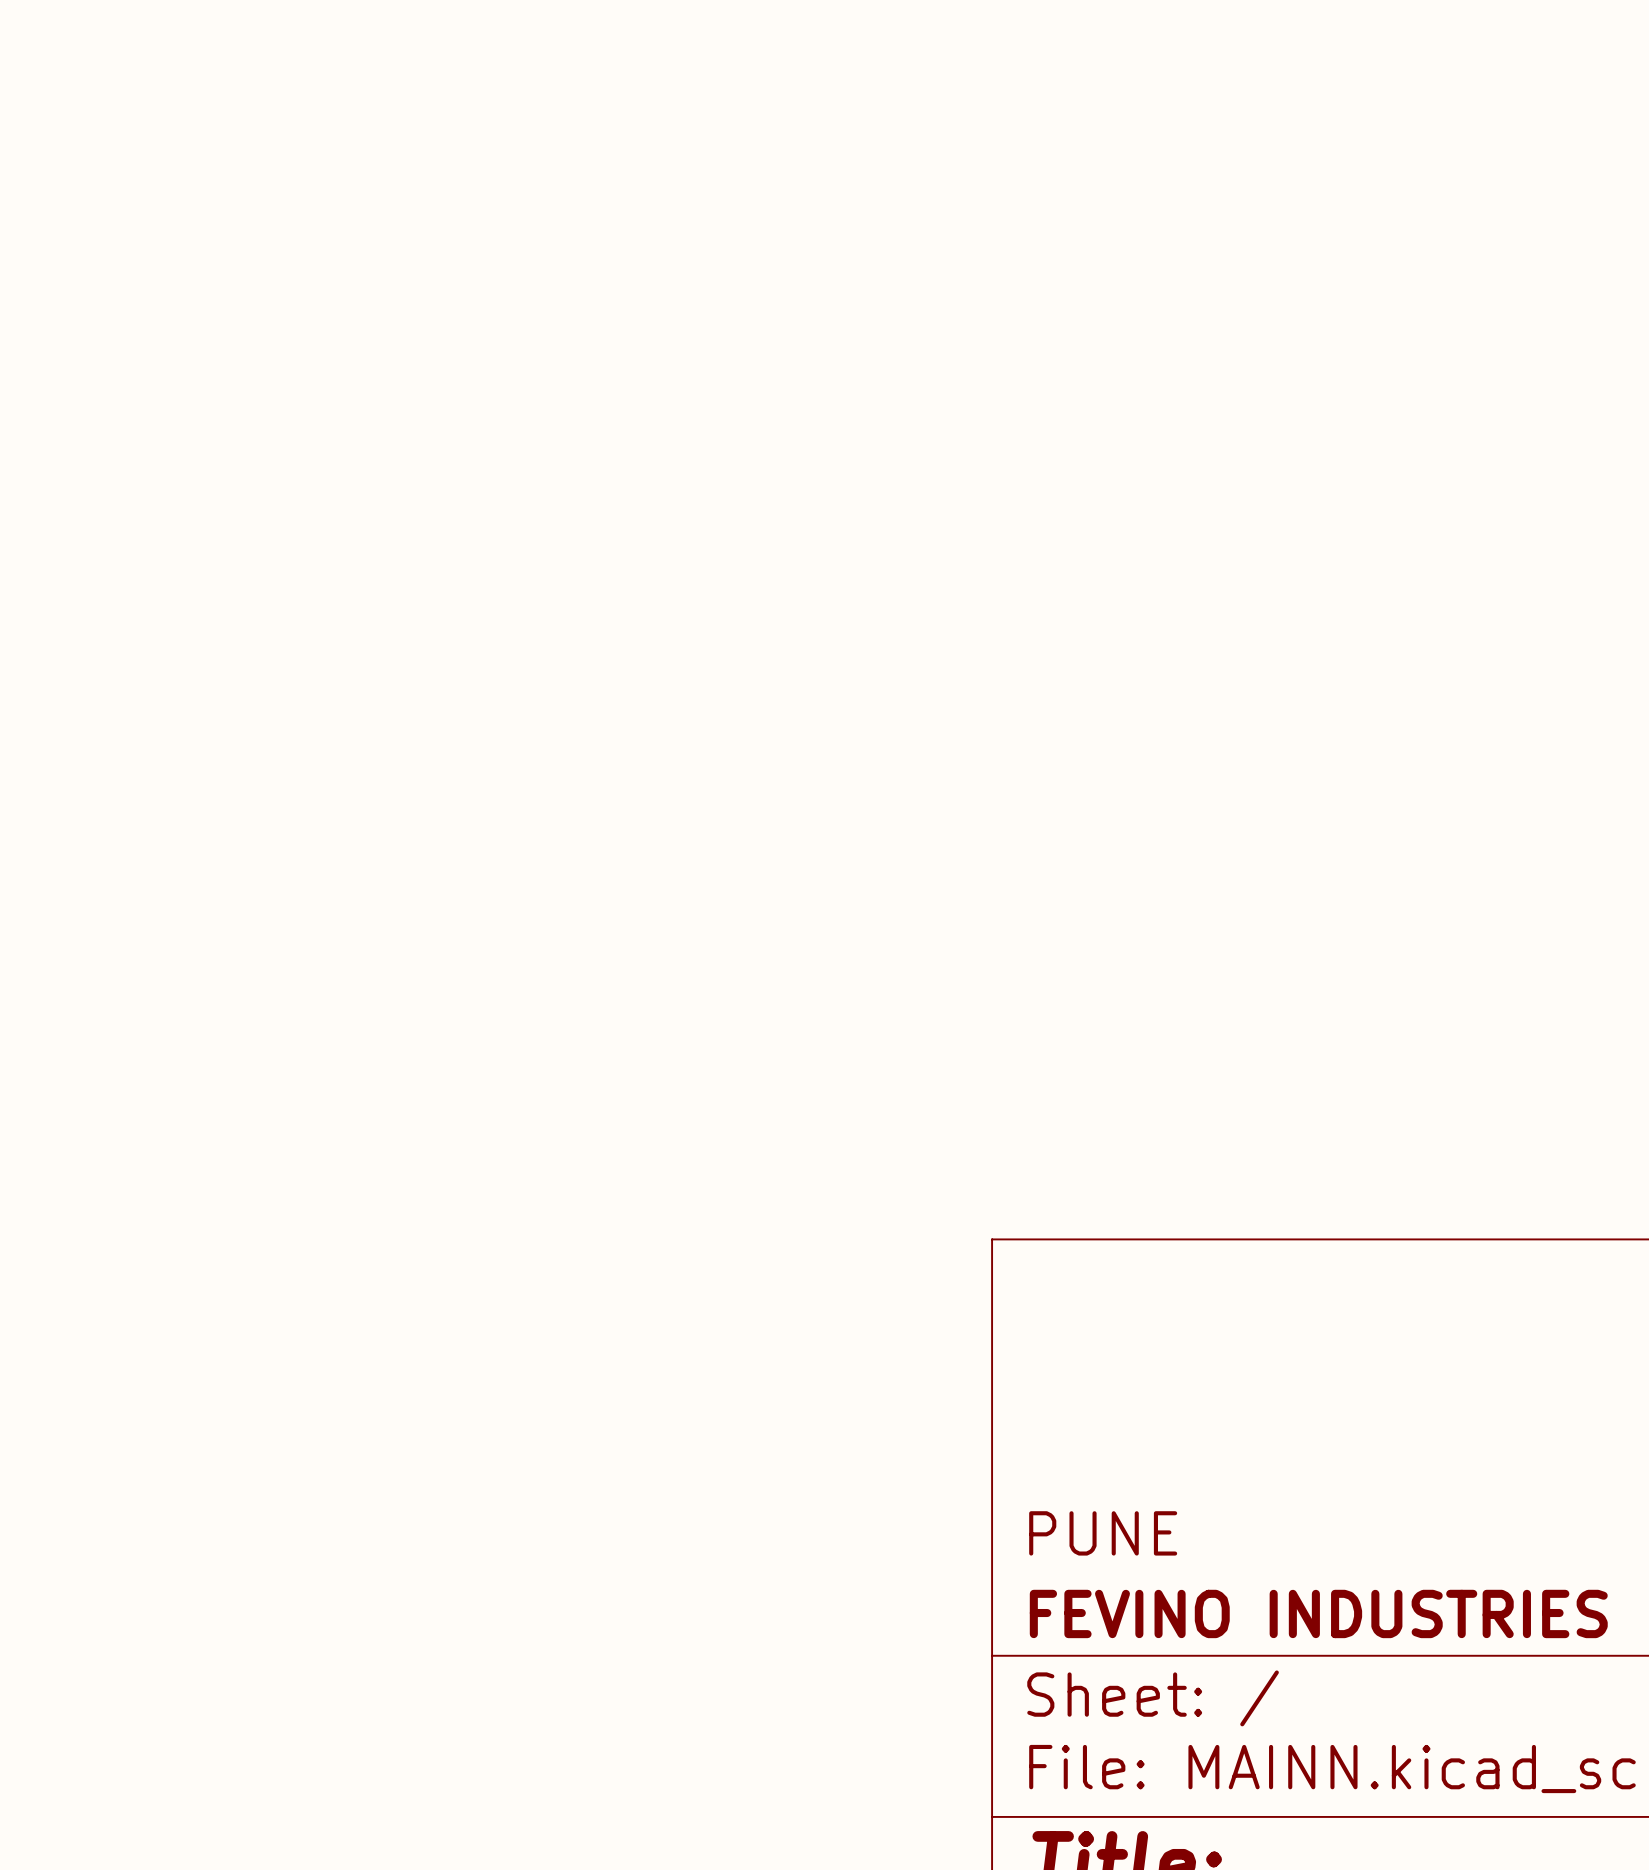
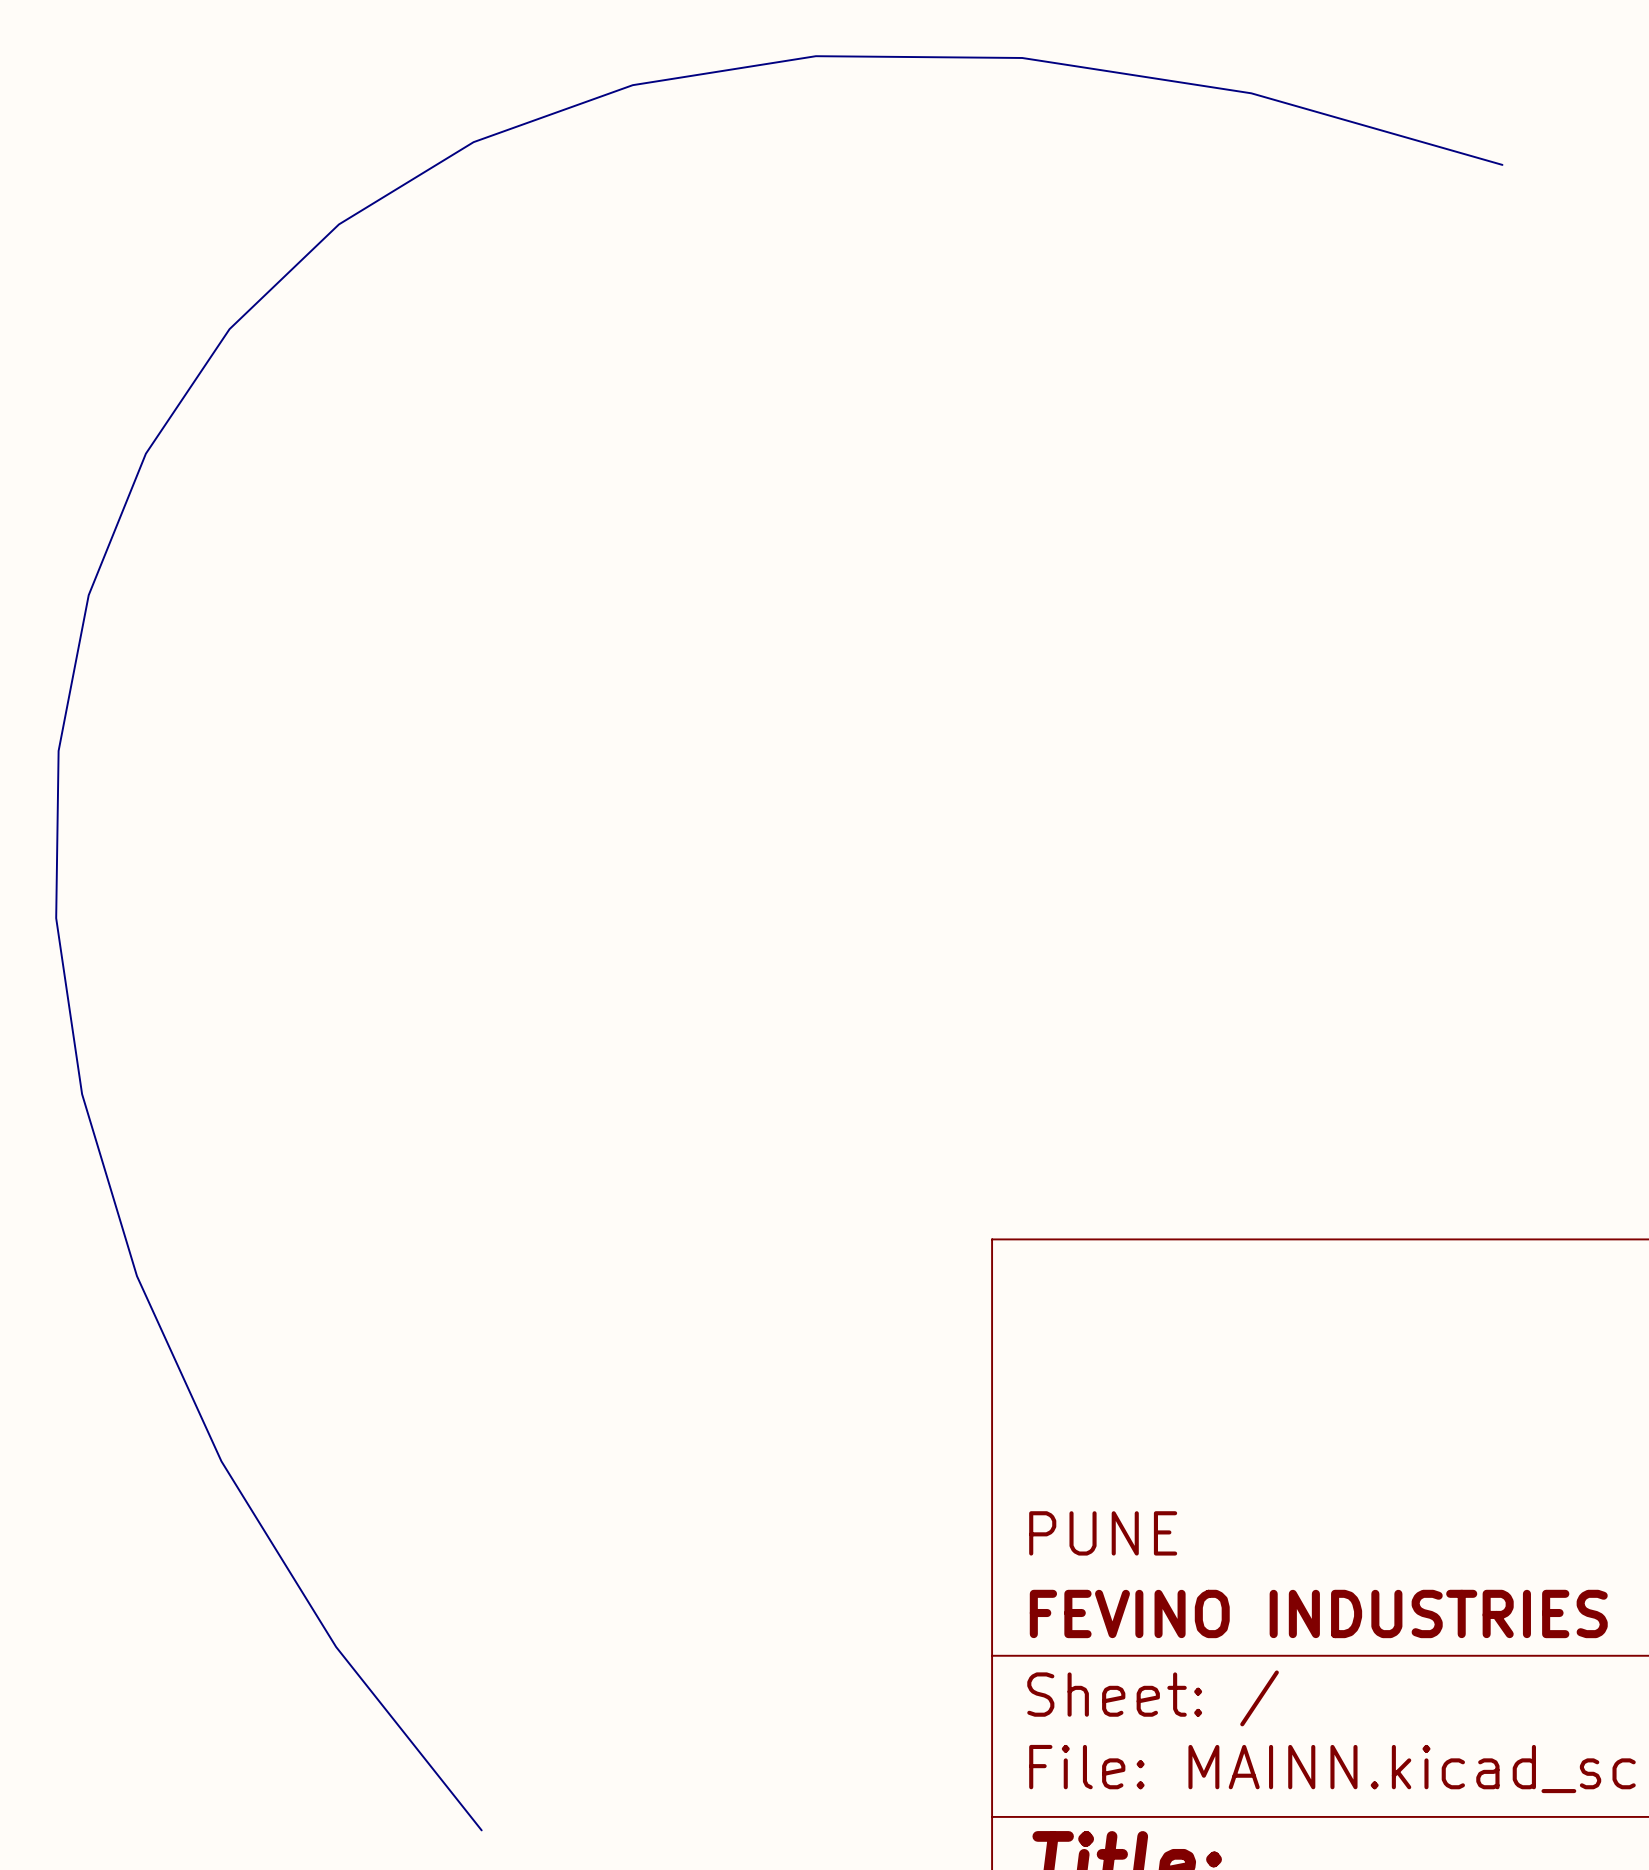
line: none -> (1502, 164) (1251, 93) (1022, 57) (815, 56) (632, 85) (473, 142) (338, 224) (229, 329) (145, 453) (88, 595) (58, 750) (56, 918) (82, 1094) (136, 1276) (221, 1461) (336, 1647) (481, 1830)

